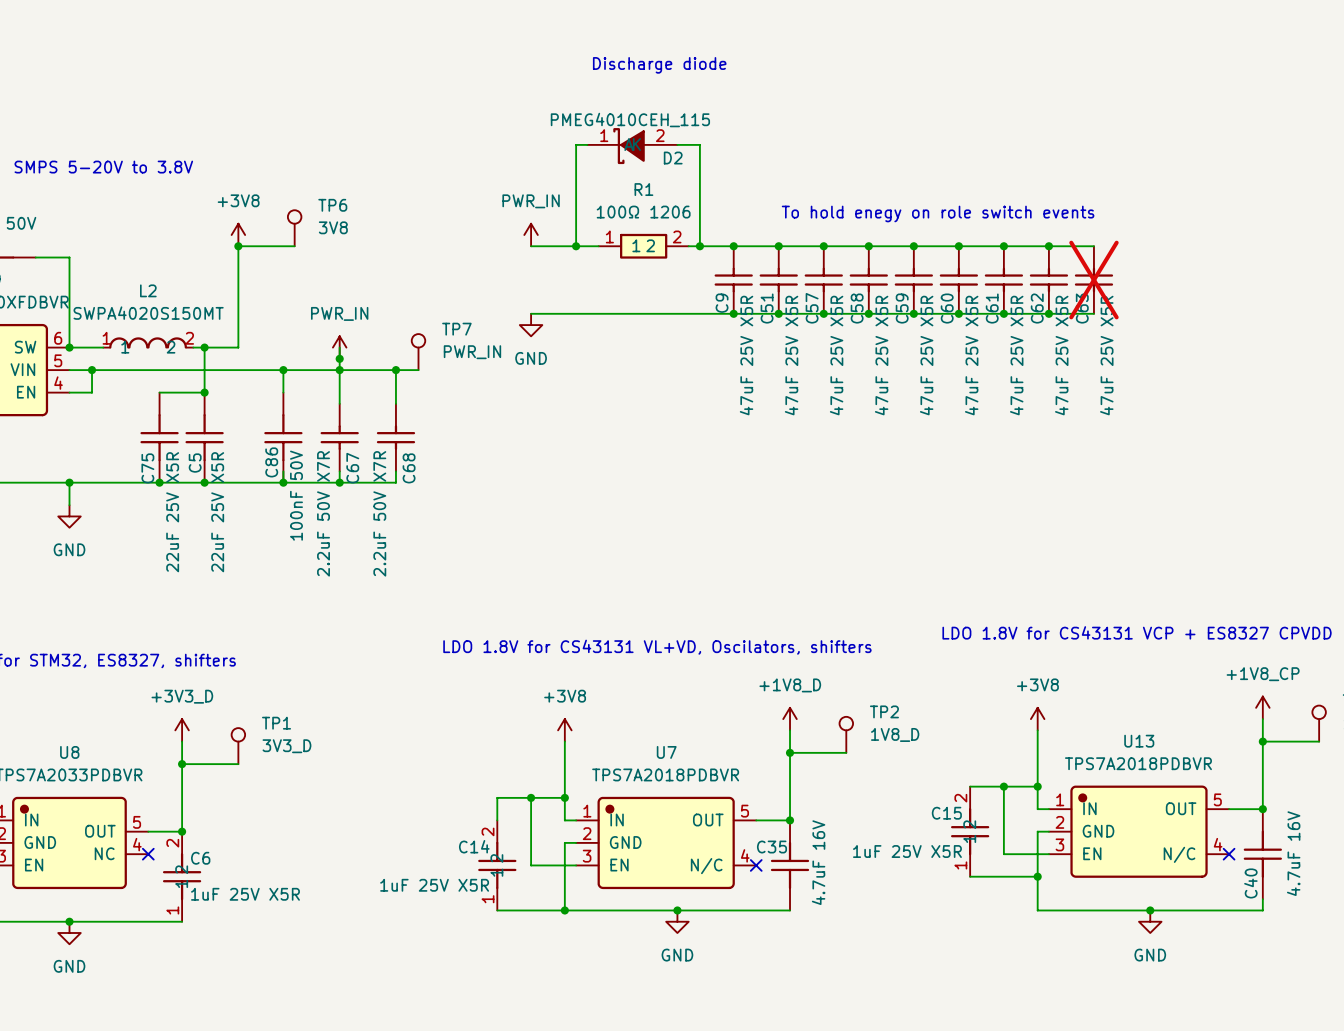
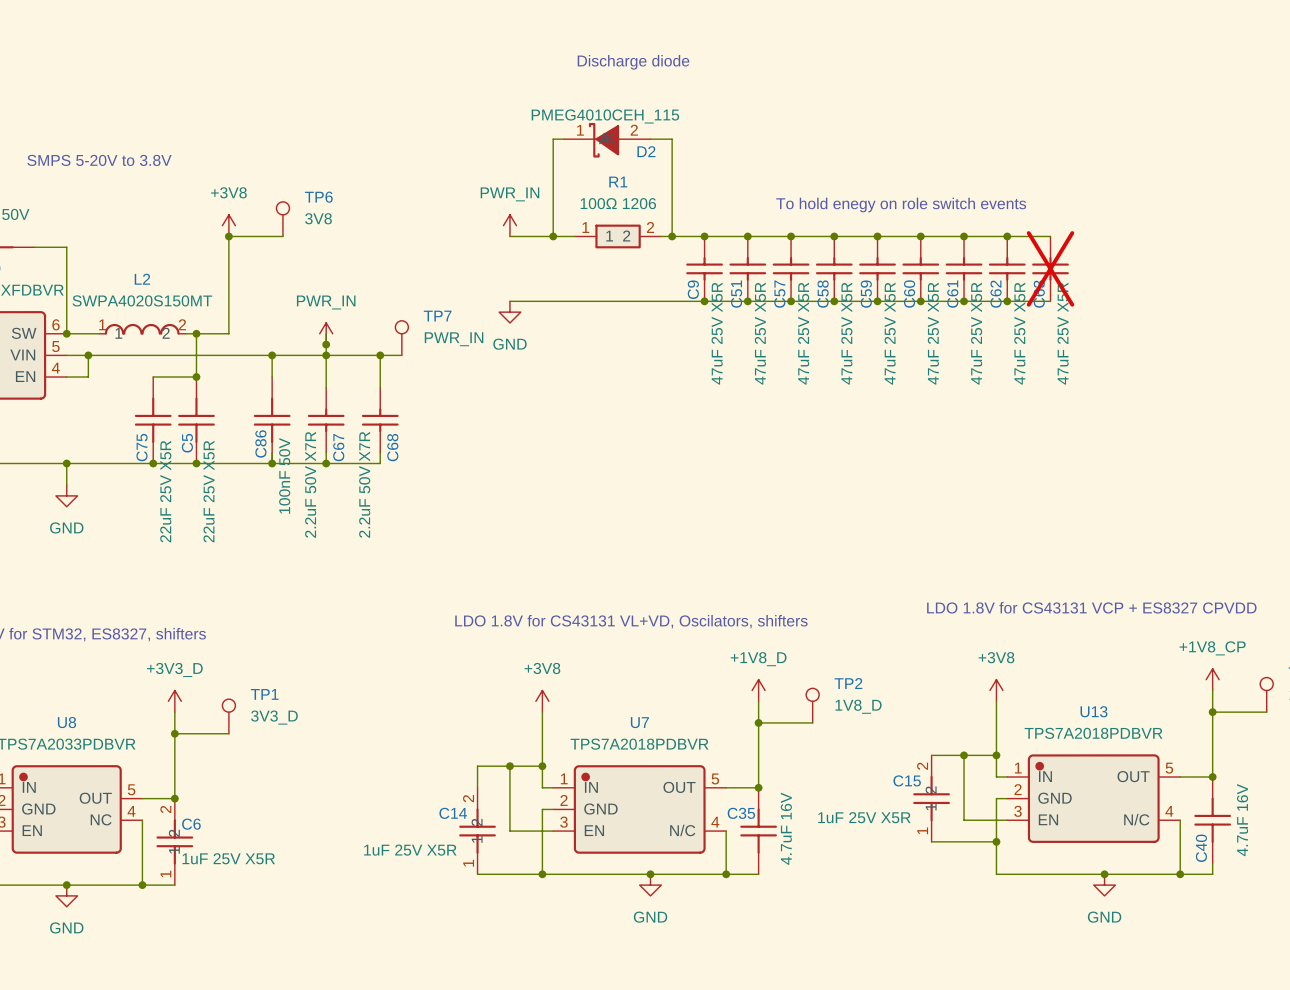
wire: none -> (142, 820) (142, 885)
no-connect mark: (148, 854) -> none
wire: none -> (1180, 820) (1180, 874)
no-connect mark: (1229, 854) -> none
wire: none -> (726, 831) (726, 874)
no-connect mark: (756, 865) -> none
junction: none -> (726, 874)
junction: none -> (1180, 874)
junction: none -> (142, 885)

